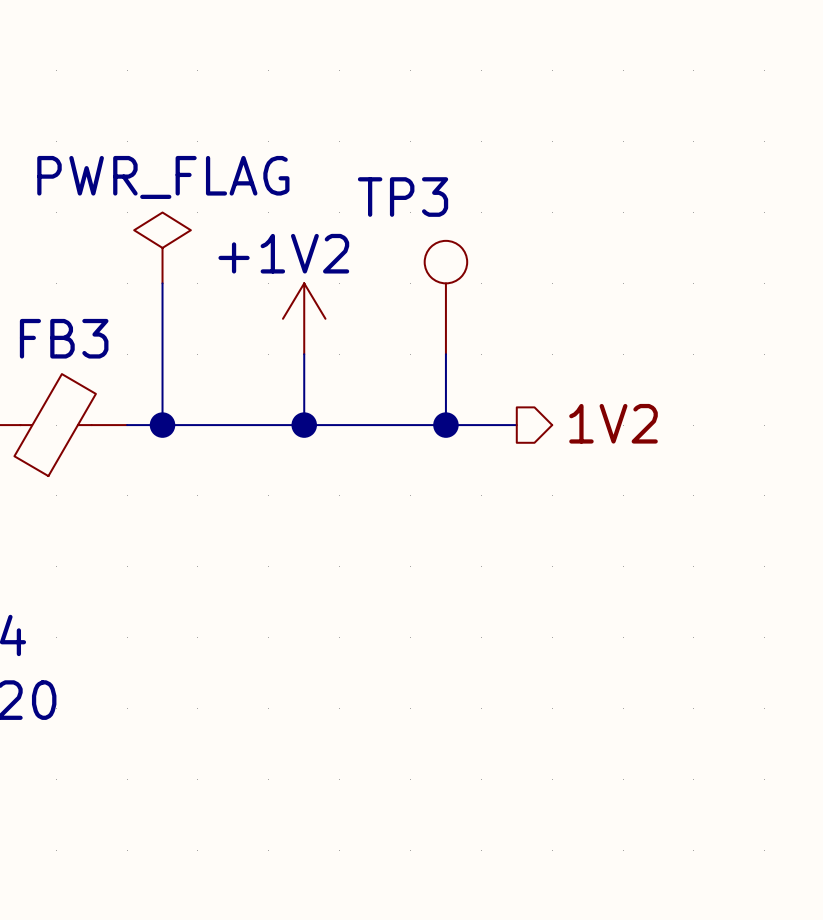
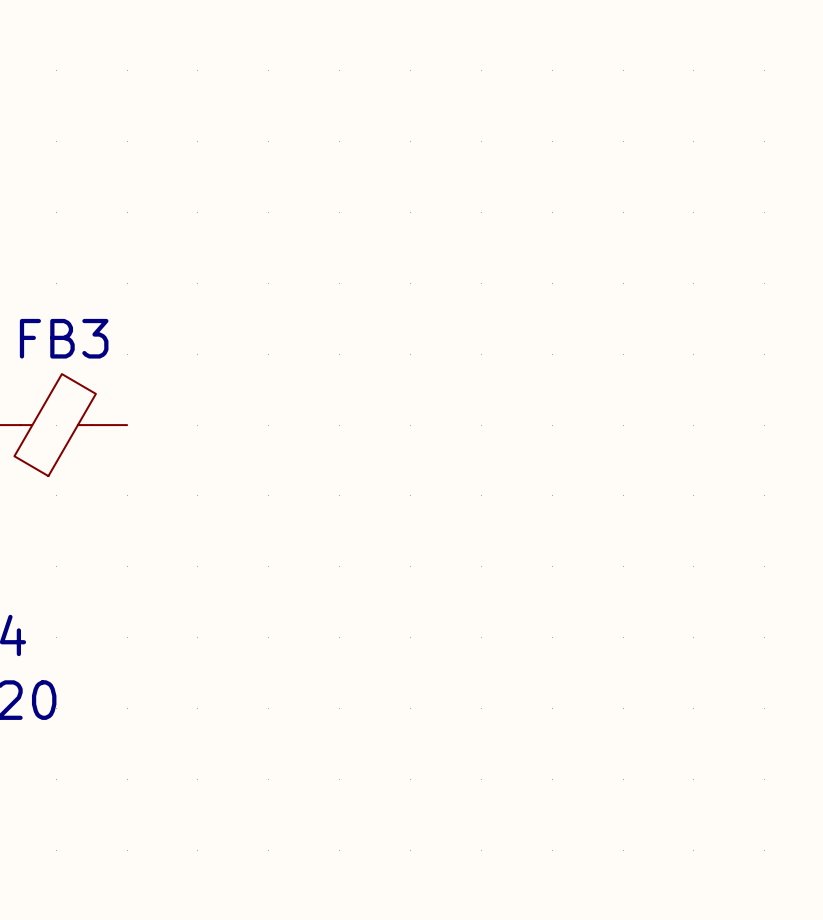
power symbol: PWR_FLAG (162, 247) -> none
wire: (162, 283) (162, 425) -> none
TP3: (445, 297) -> none
power symbol: +1V2 (304, 318) -> none
wire: (304, 354) (304, 425) -> none
wire: (445, 354) (445, 425) -> none
hierarchical label: 1V2 (613, 423) -> none
wire: (127, 425) (516, 425) -> none
junction: (162, 425) -> none
junction: (304, 425) -> none
junction: (445, 425) -> none

